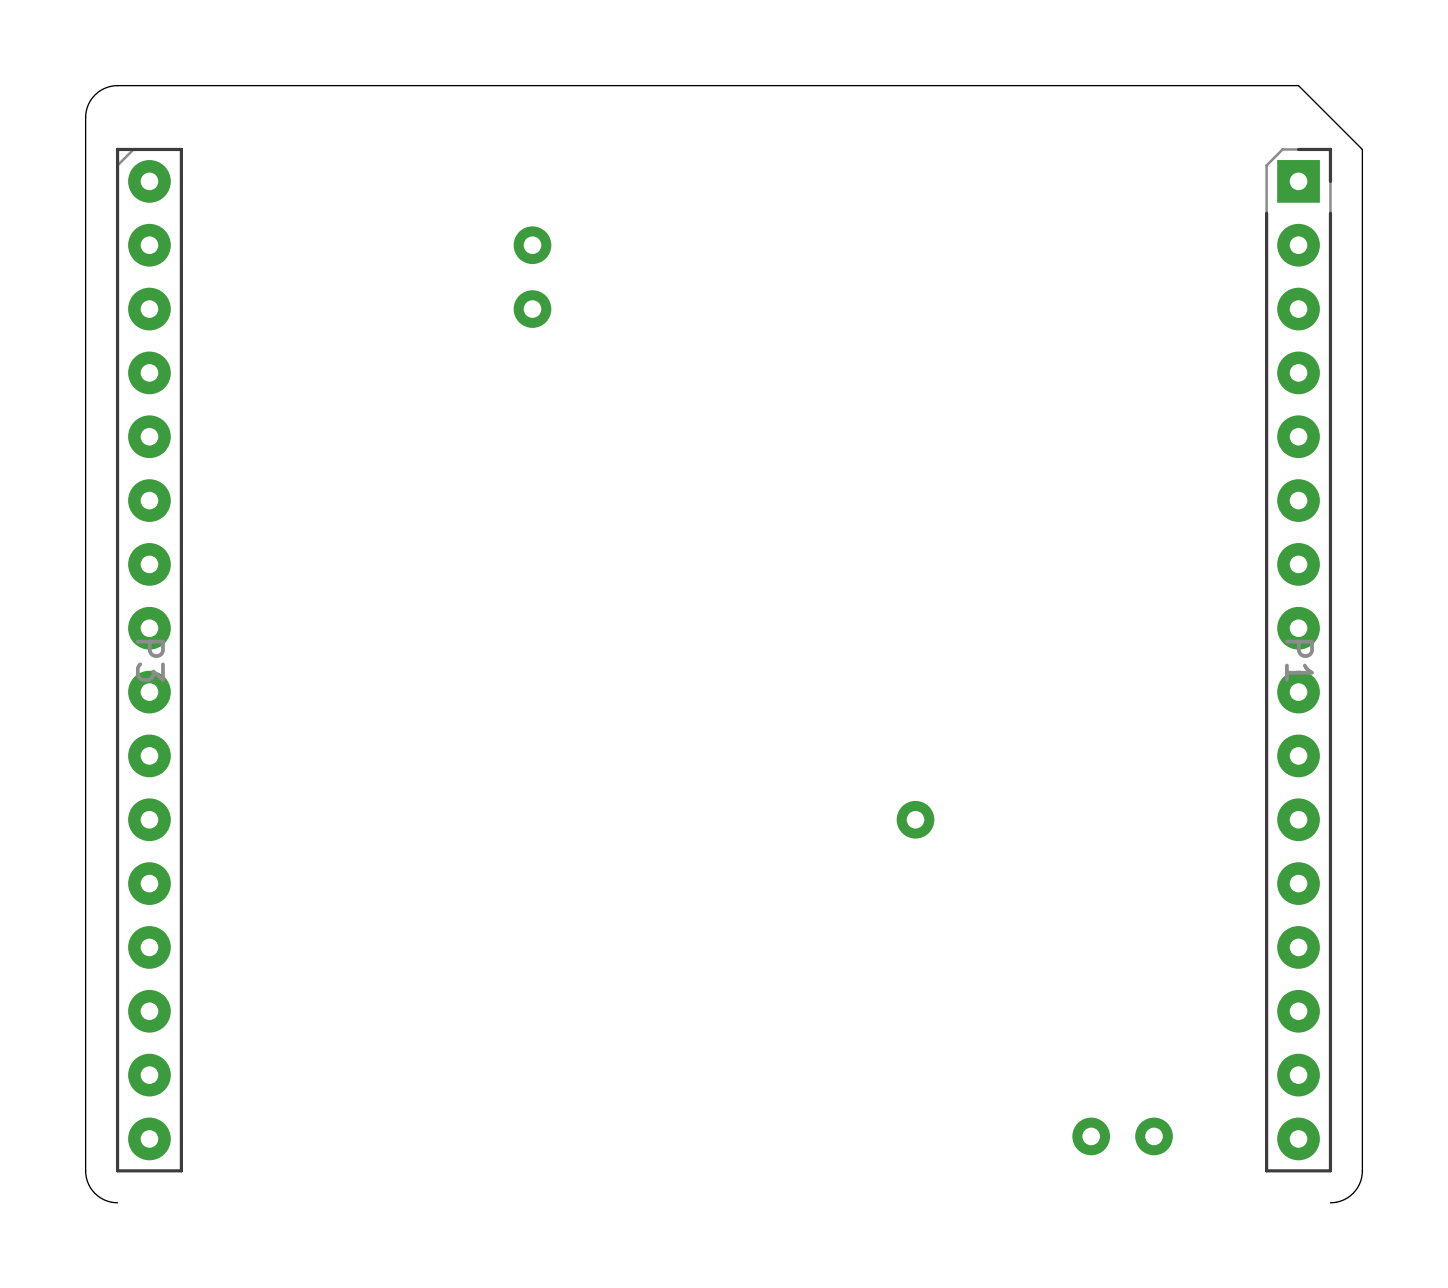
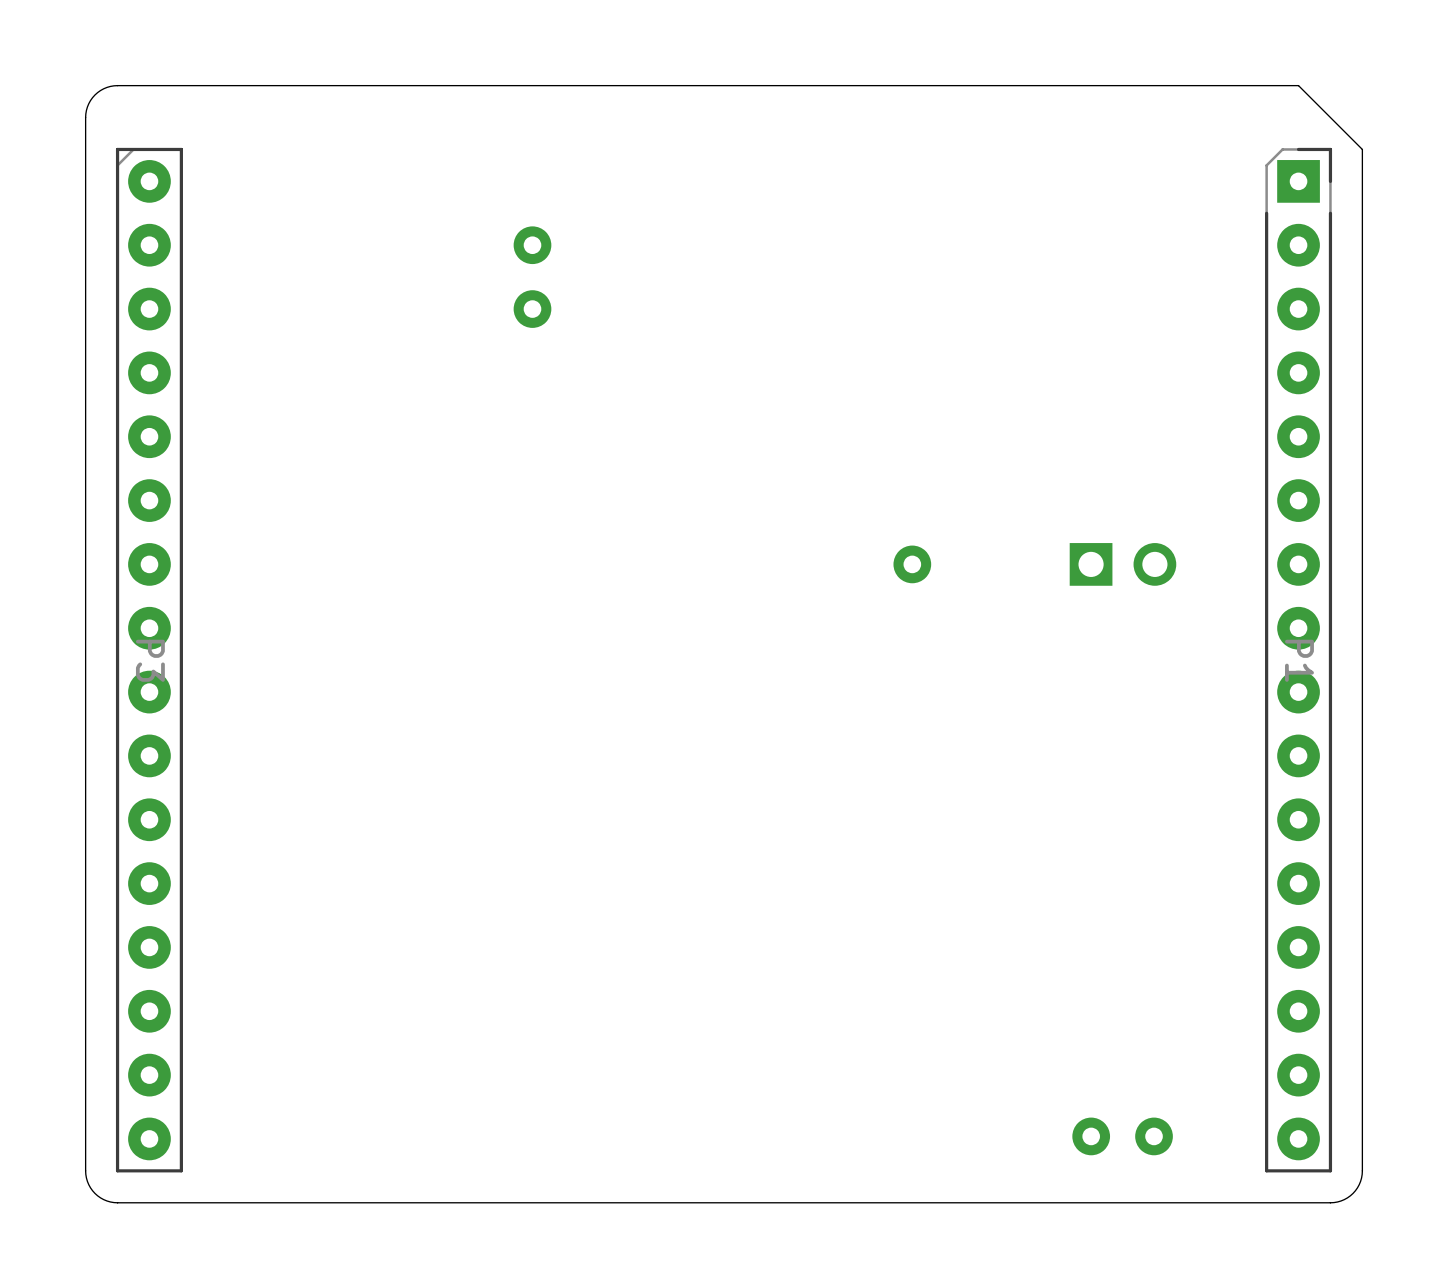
part: none -> (1122, 564)
part position: (915, 819) -> (912, 564)
board edge: none -> (1330, 1202) (117, 1202)

